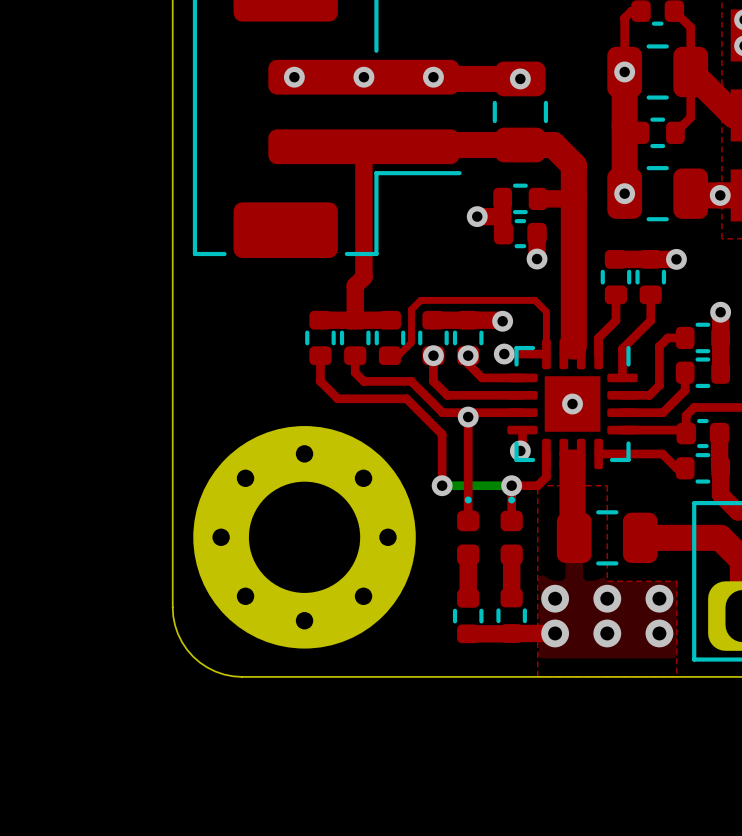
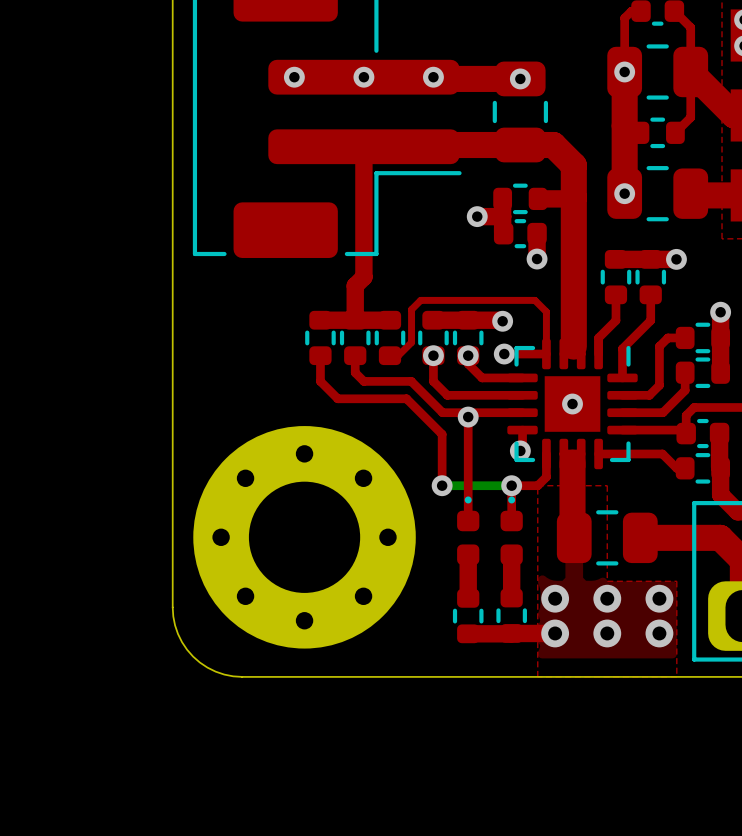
via: (720, 195) -> none

